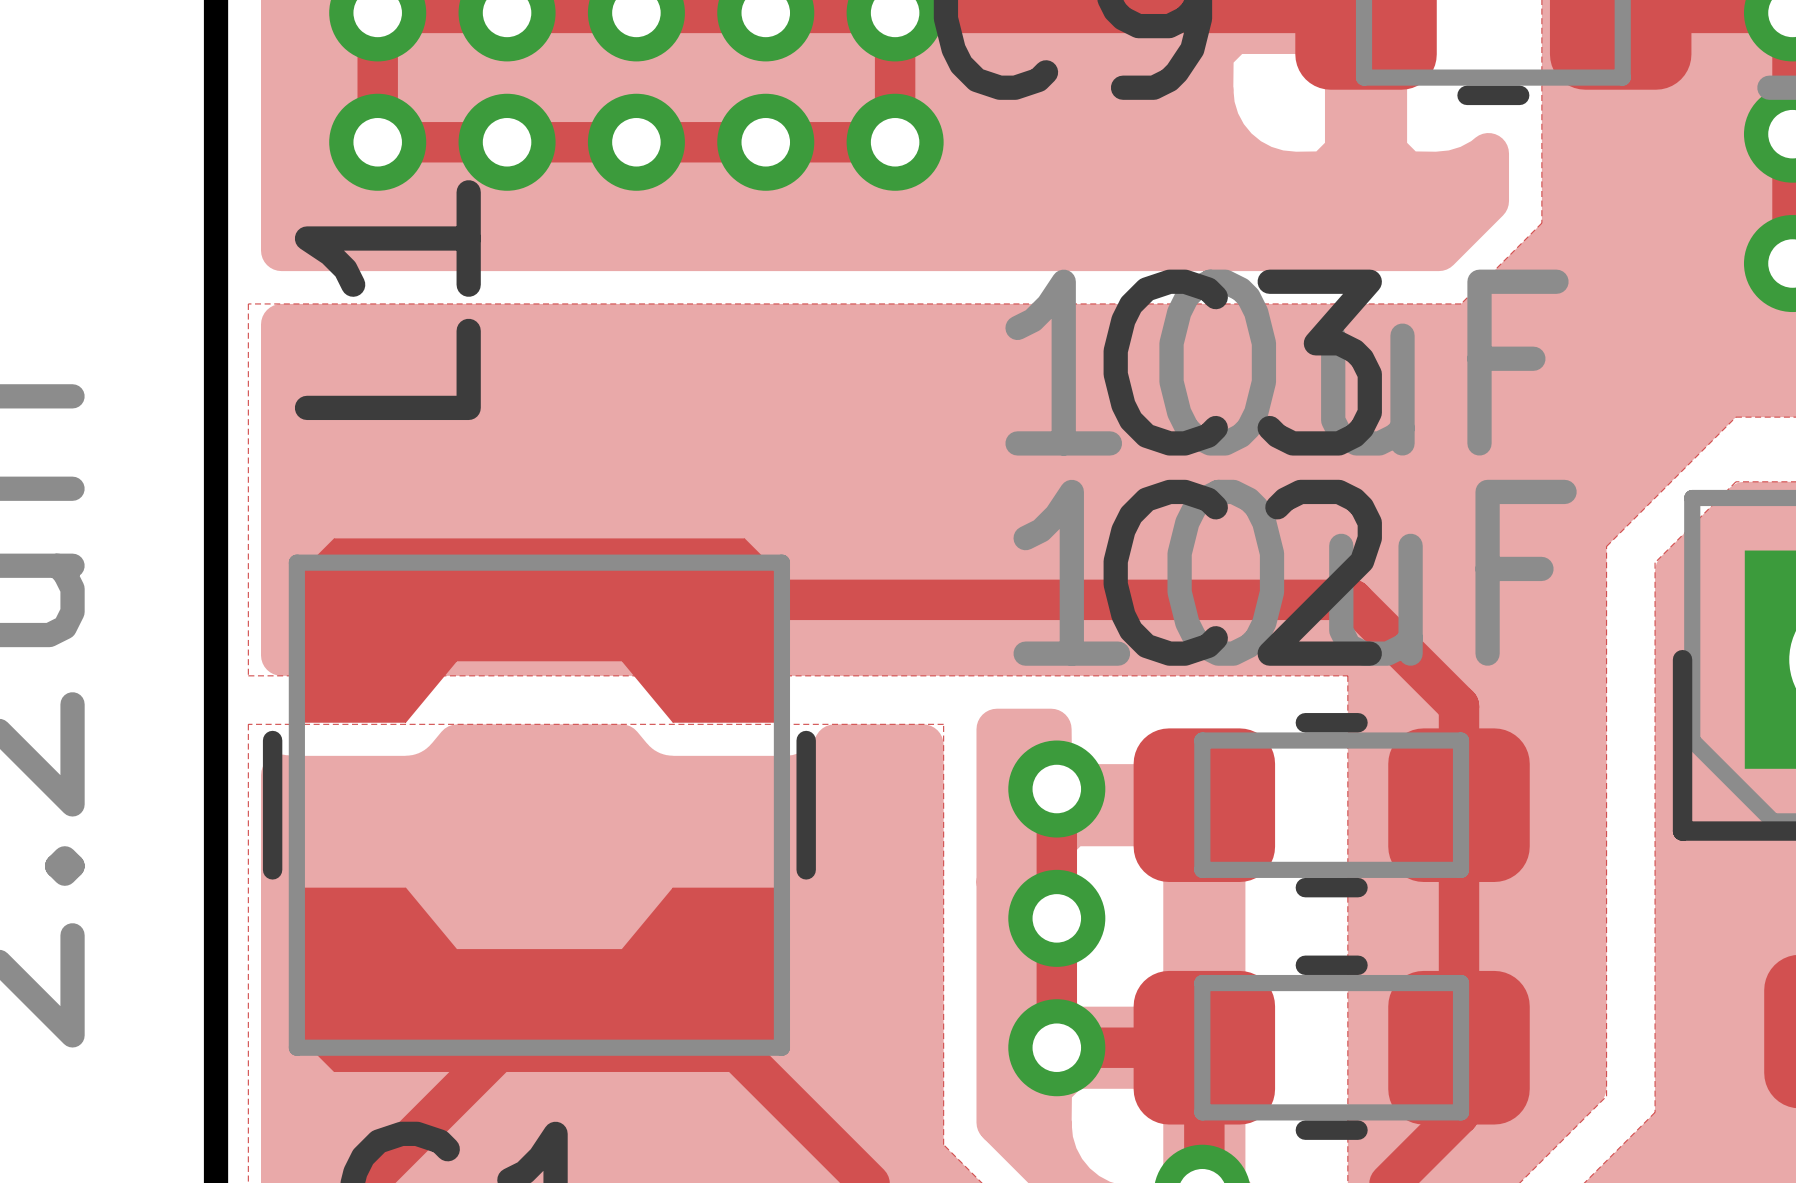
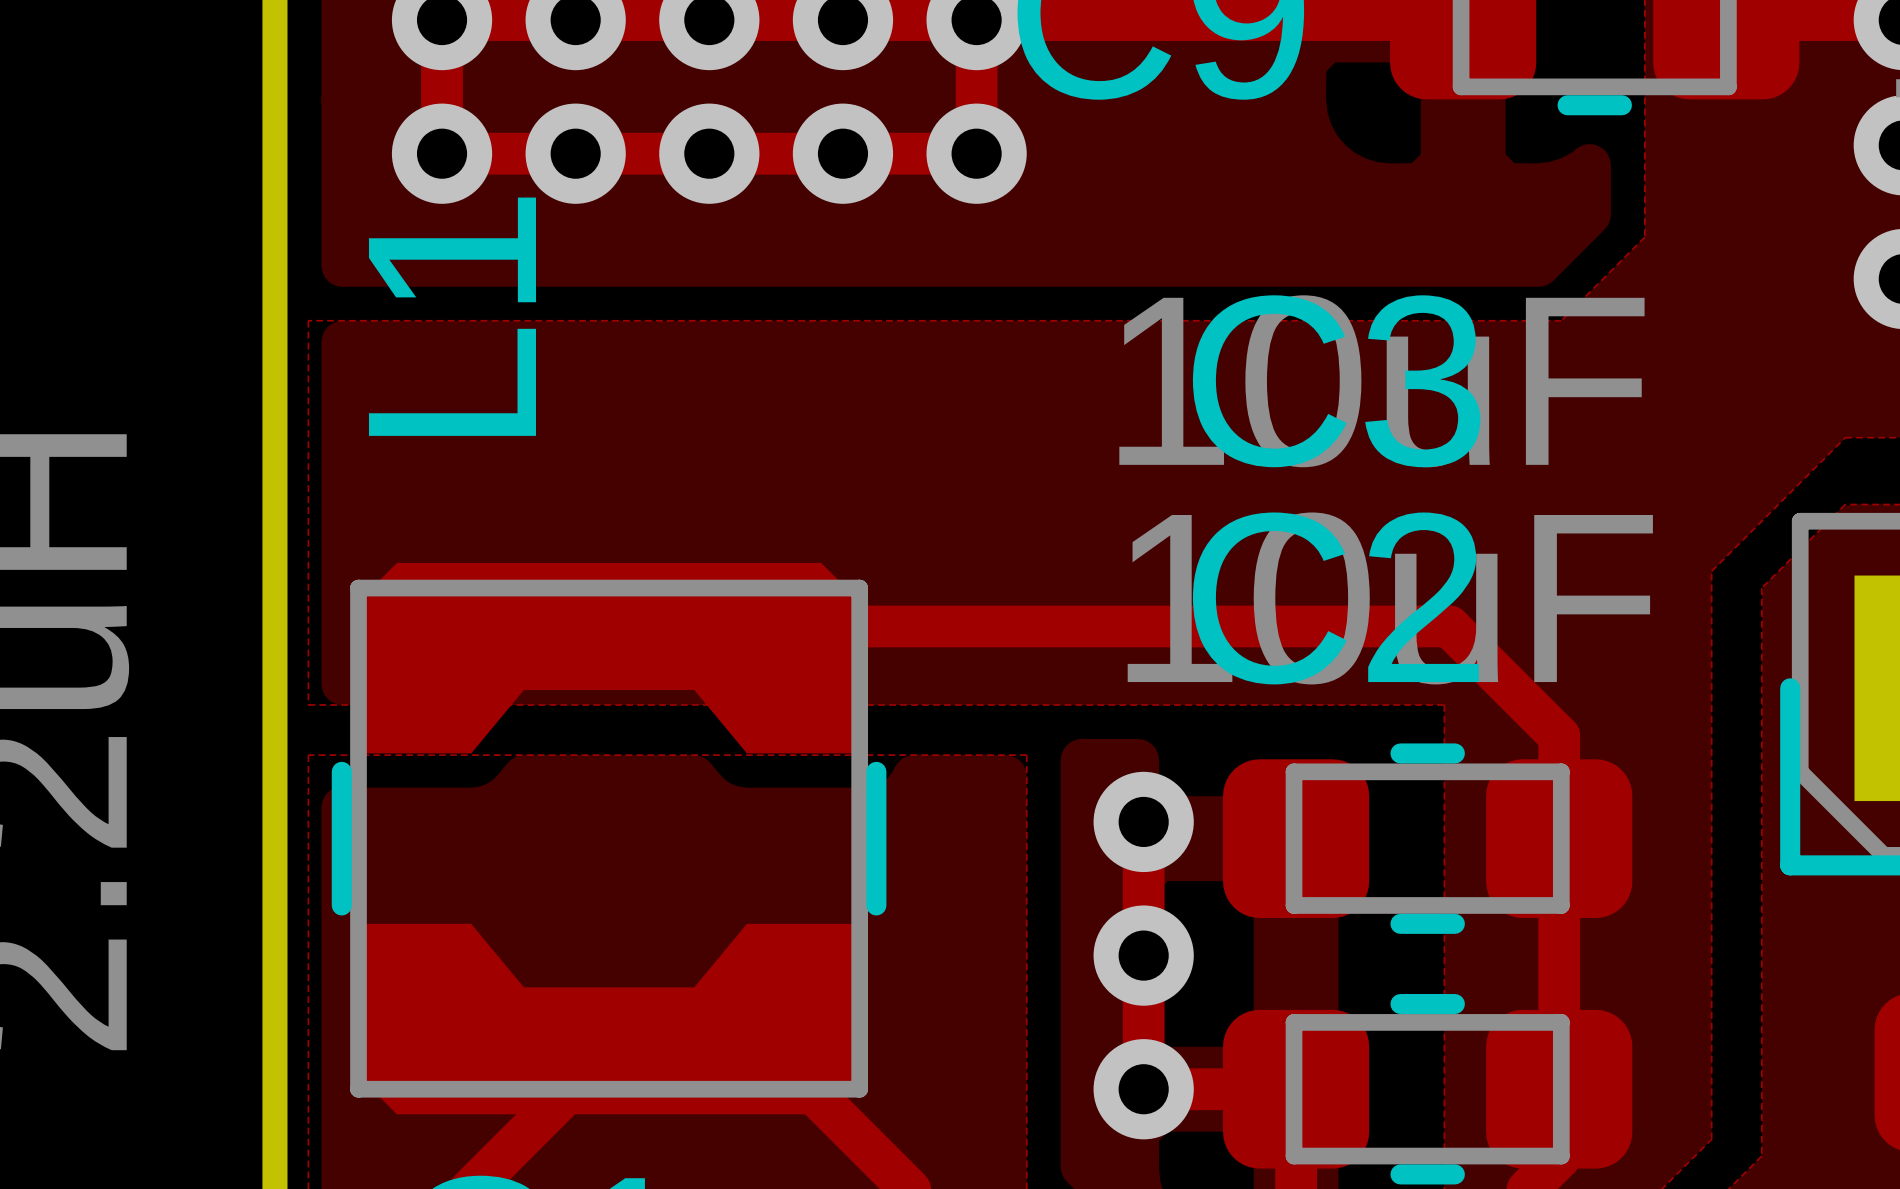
L1 footprint: [262, 538, 816, 1072] -> [331, 563, 887, 1115]

